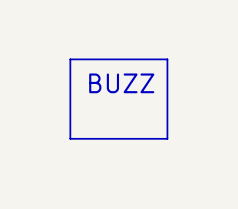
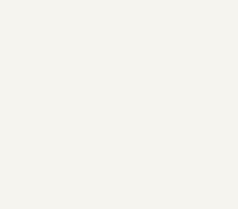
line: (70, 59) (167, 59) (167, 138) (70, 138) (70, 59) -> none
text: BUZZ (121, 83) -> none

